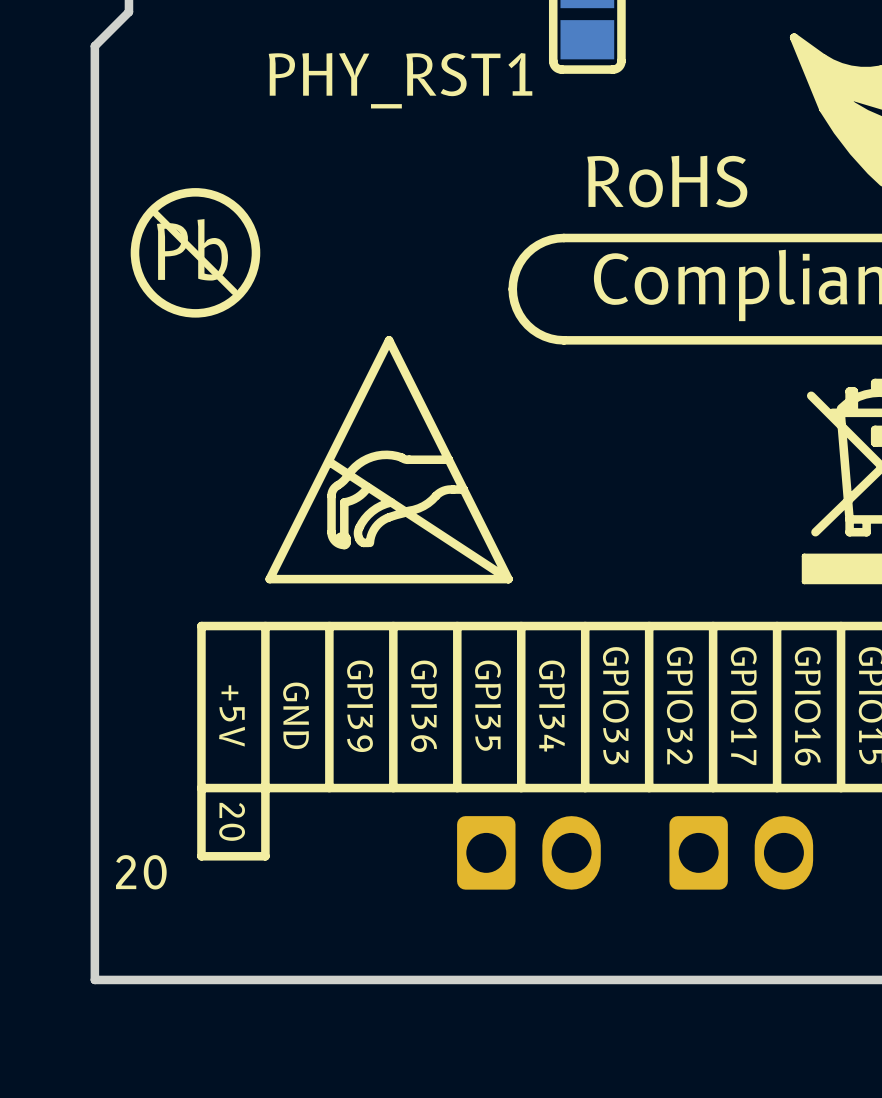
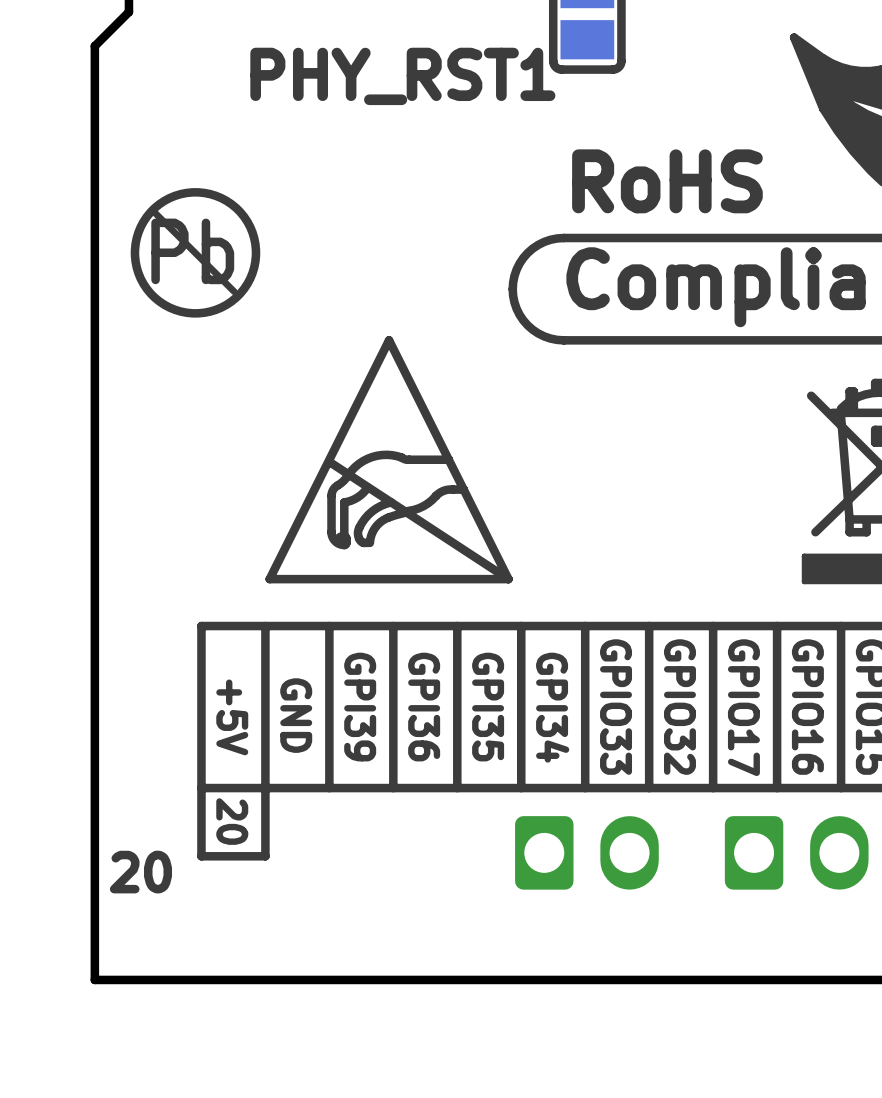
part position: (528, 852) -> (586, 852)
part position: (741, 852) -> (796, 852)

